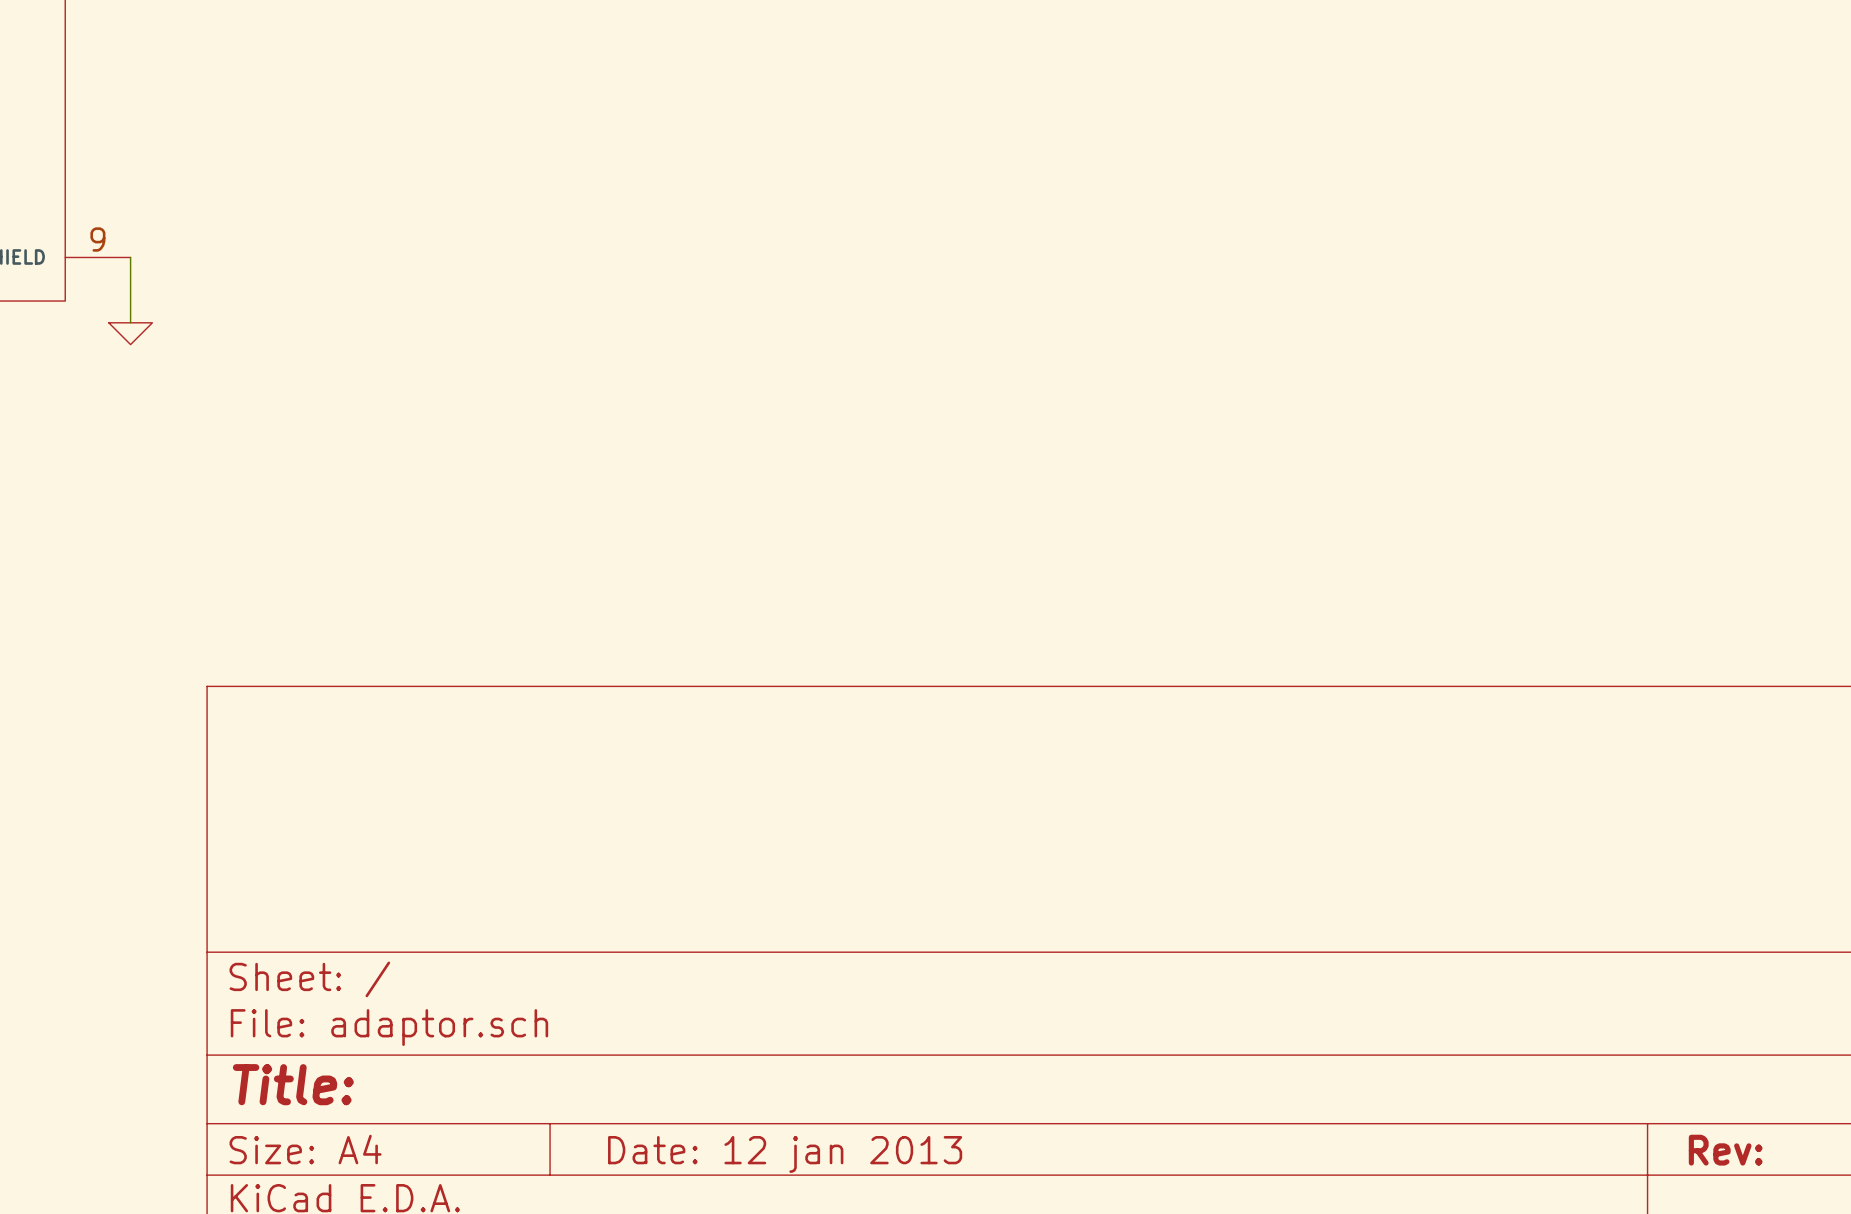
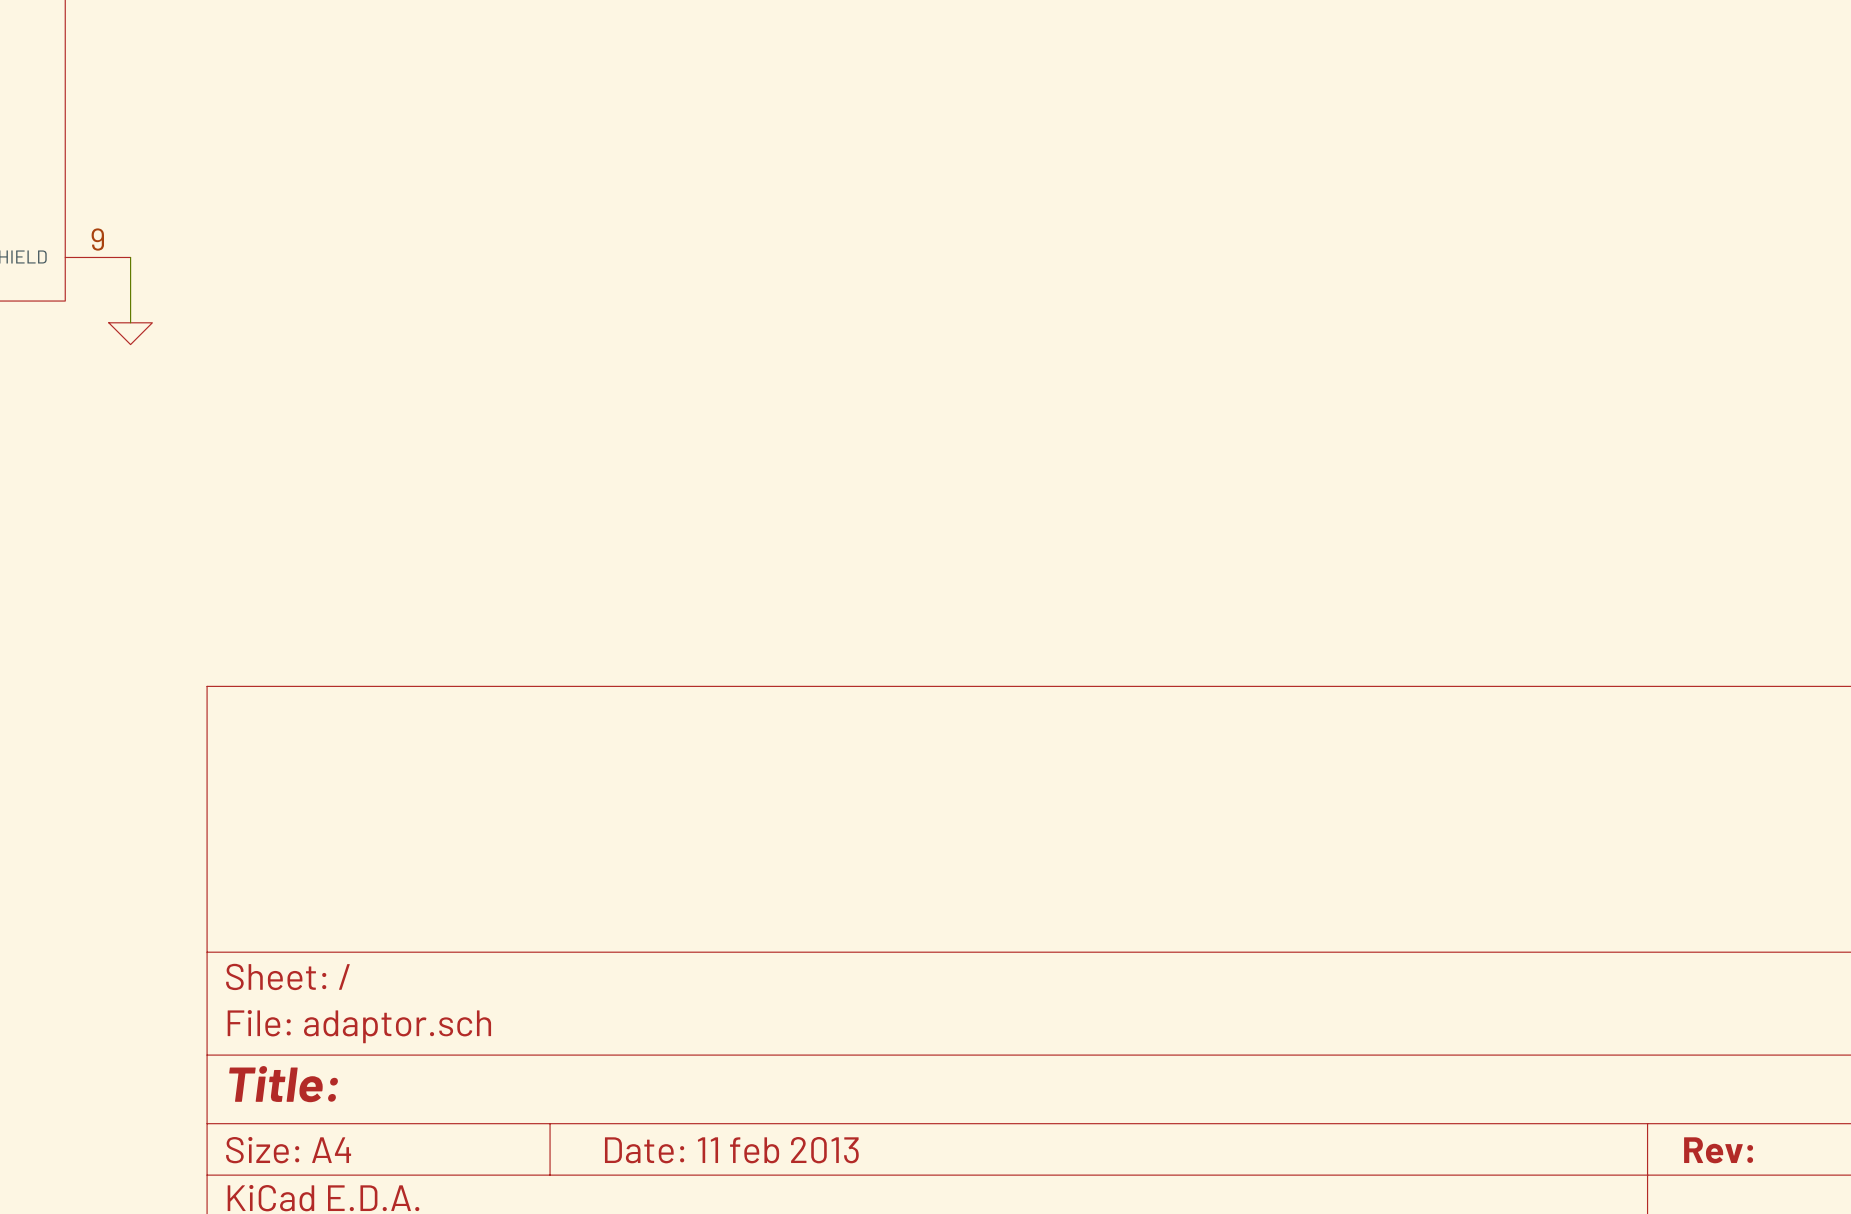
title block: Date: 12 jan 2013 (785, 1154) -> Date: 11 feb 2013 (731, 1150)

